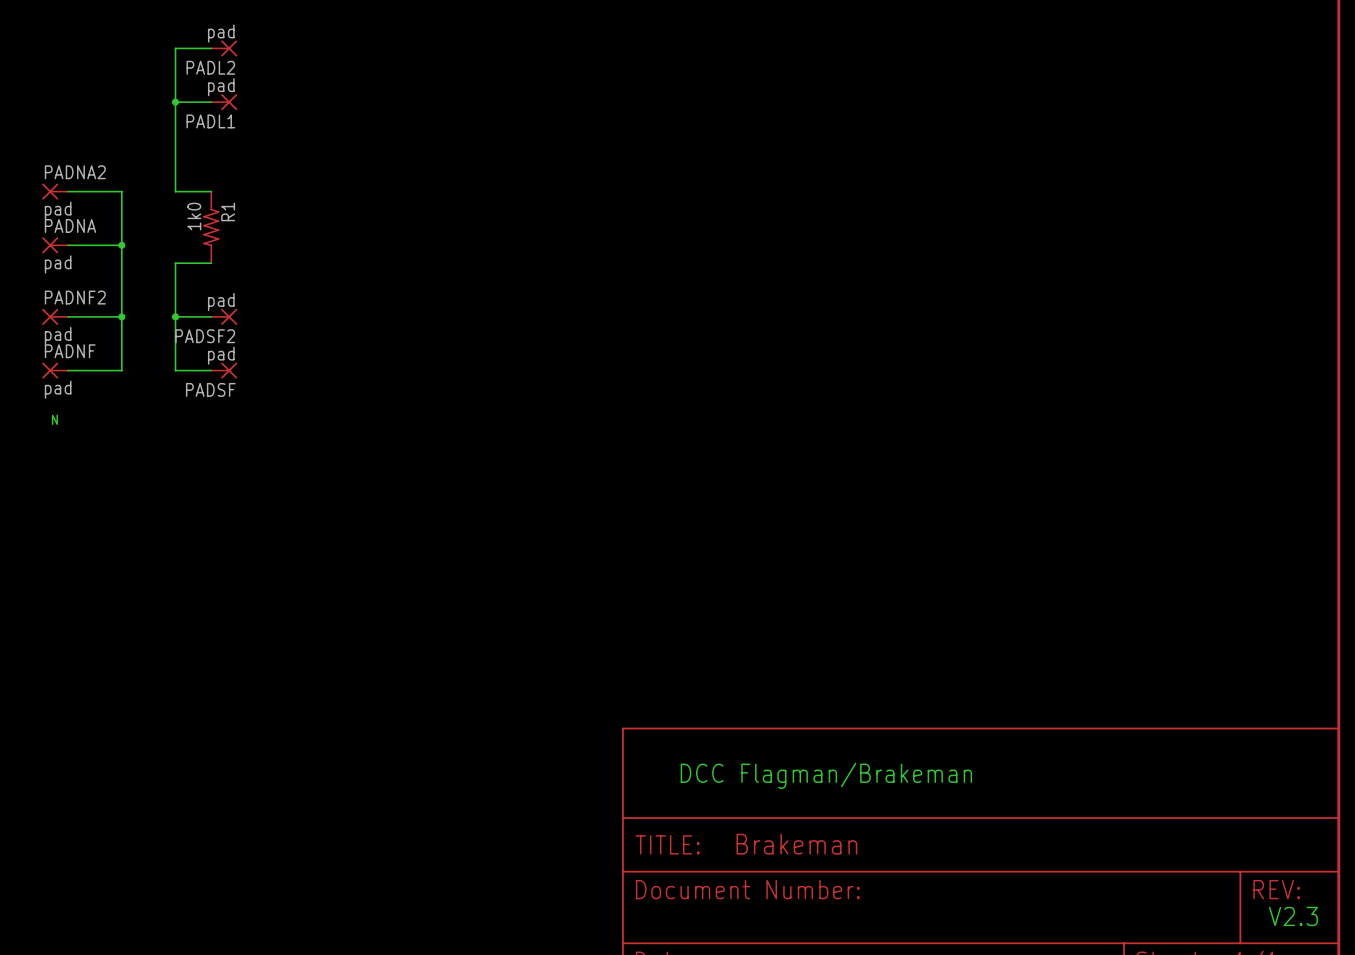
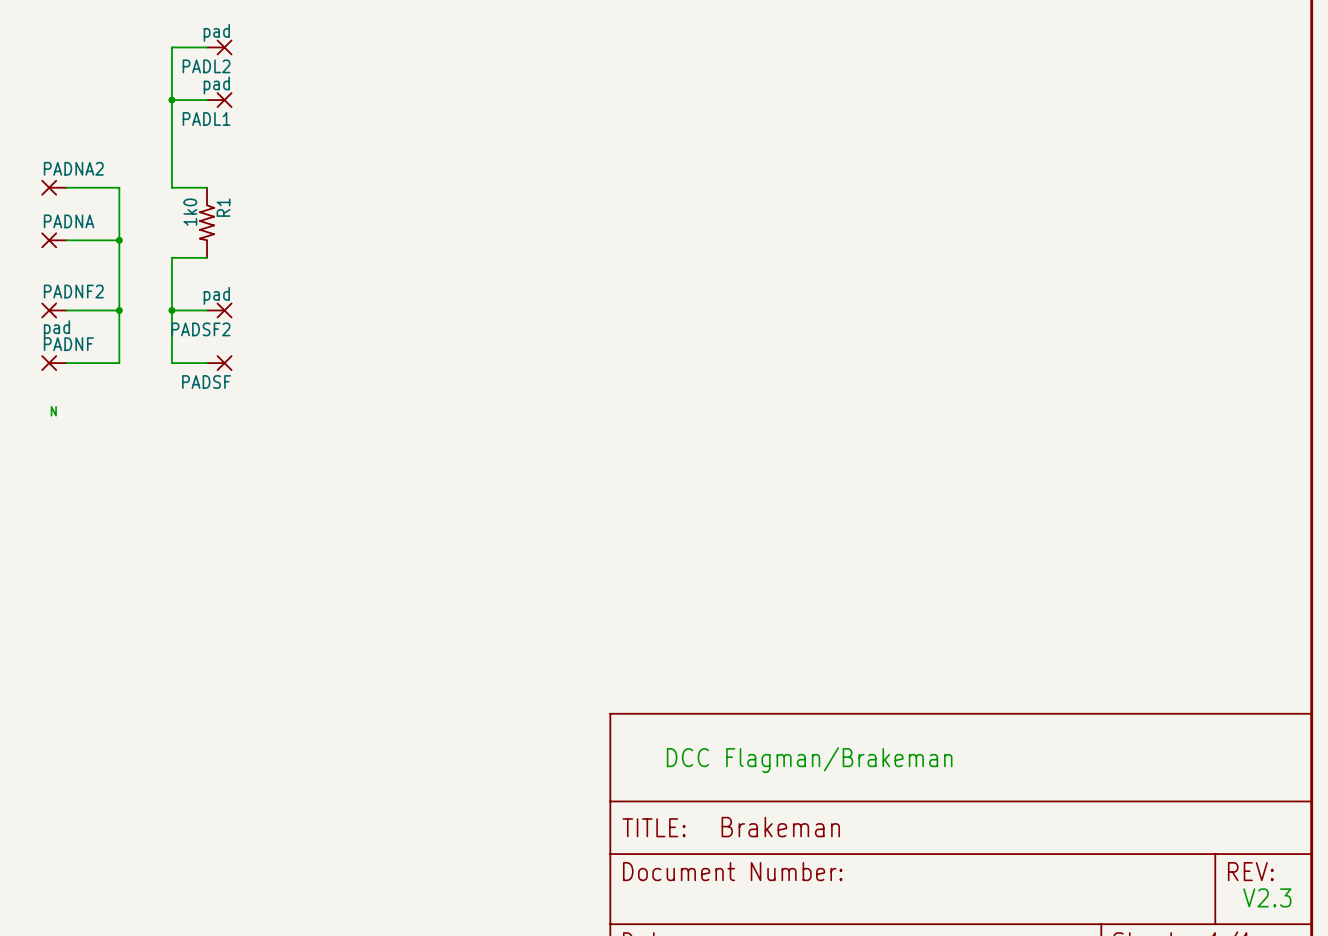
PADNA2 value: pad (58, 210) -> none
PADNA value: pad (58, 264) -> none
PADSF value: pad (221, 355) -> none
PADNF value: pad (58, 389) -> none

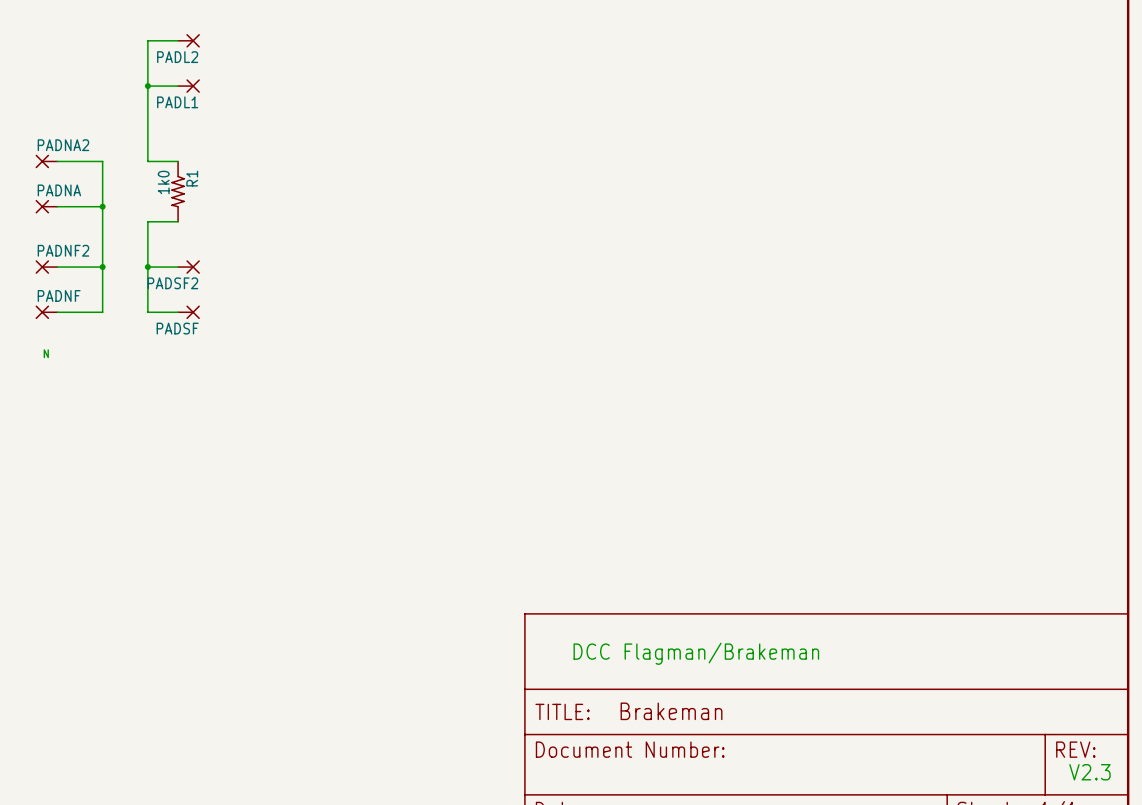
PADL2 value: pad (216, 32) -> none
PADL1 value: pad (216, 85) -> none
PADSF2 value: pad (216, 295) -> none
PADNF2 value: pad (56, 329) -> none

